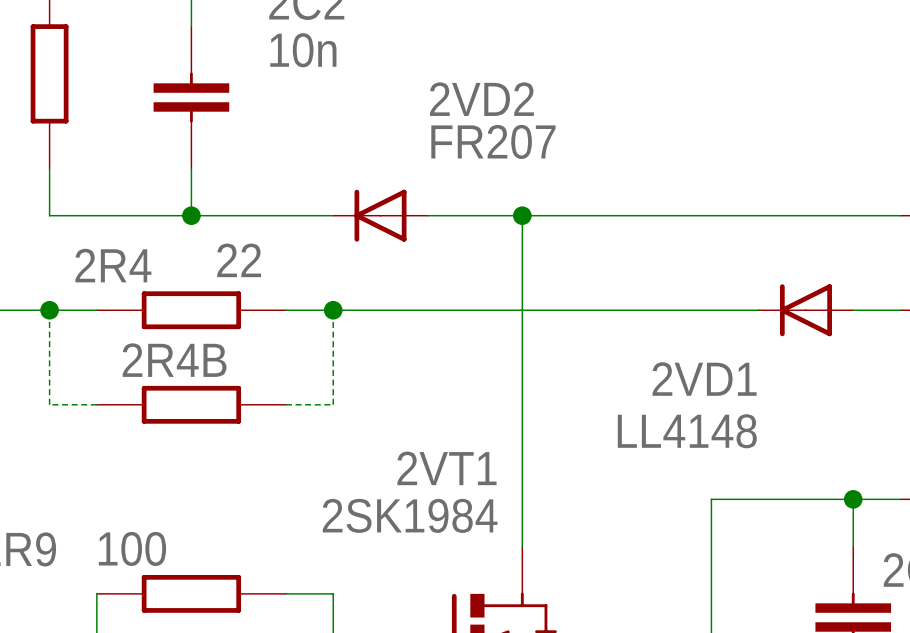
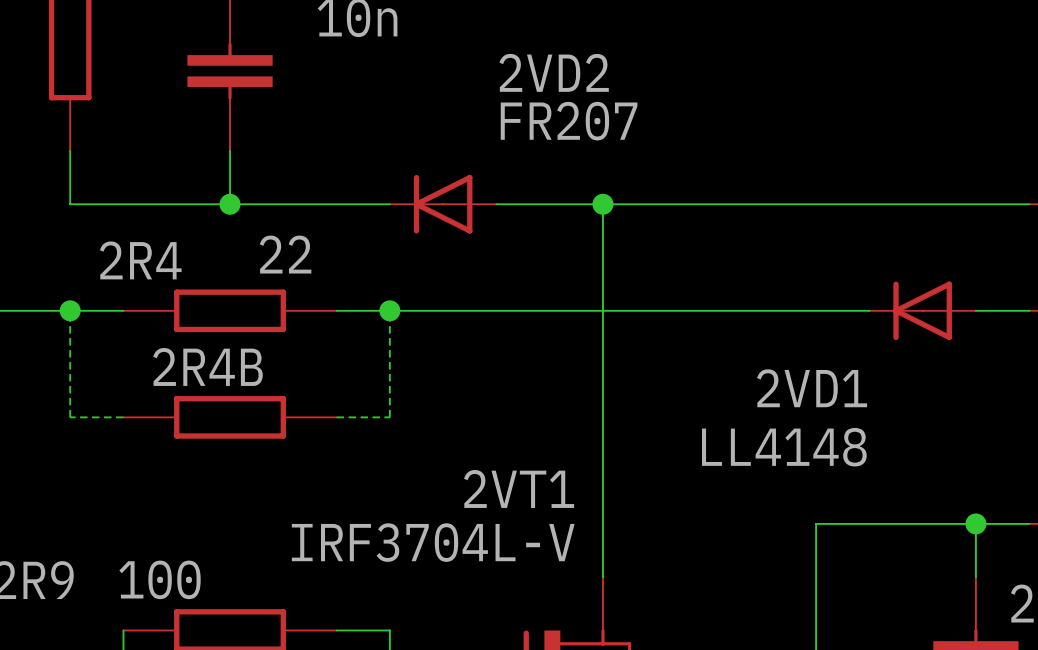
2VT1 value: 2SK1984 (410, 515) -> IRF3704L-V (433, 542)

